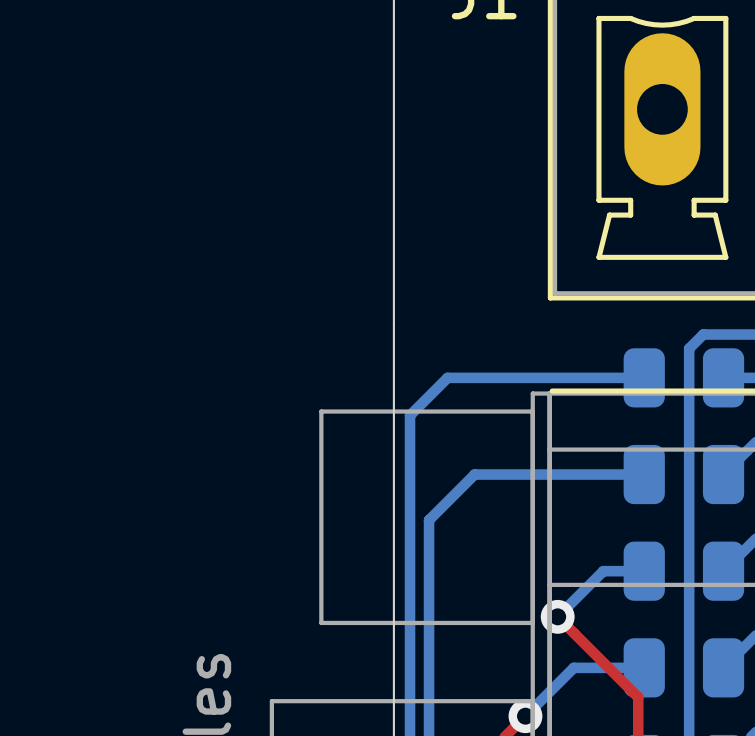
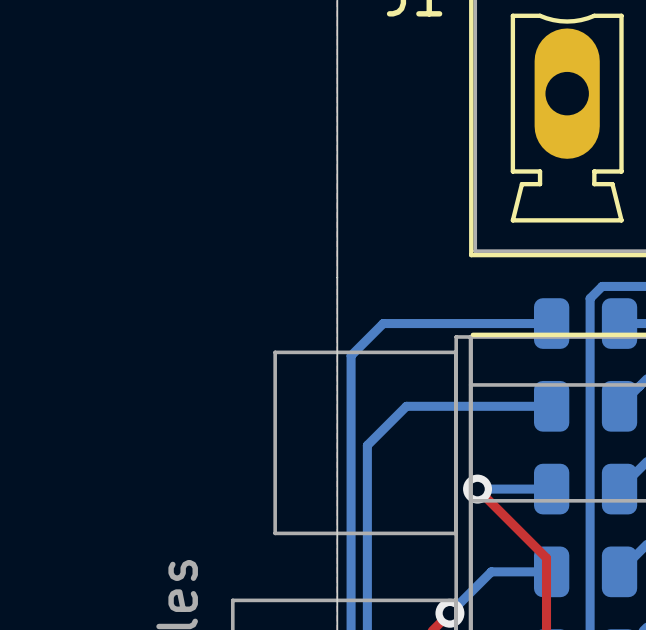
bottom track: (603, 571) (557, 616) -> (516, 489) (477, 489)
top track: (557, 616) (638, 697) -> (477, 489) (546, 558) (546, 597)
via position: (557, 616) -> (477, 489)

